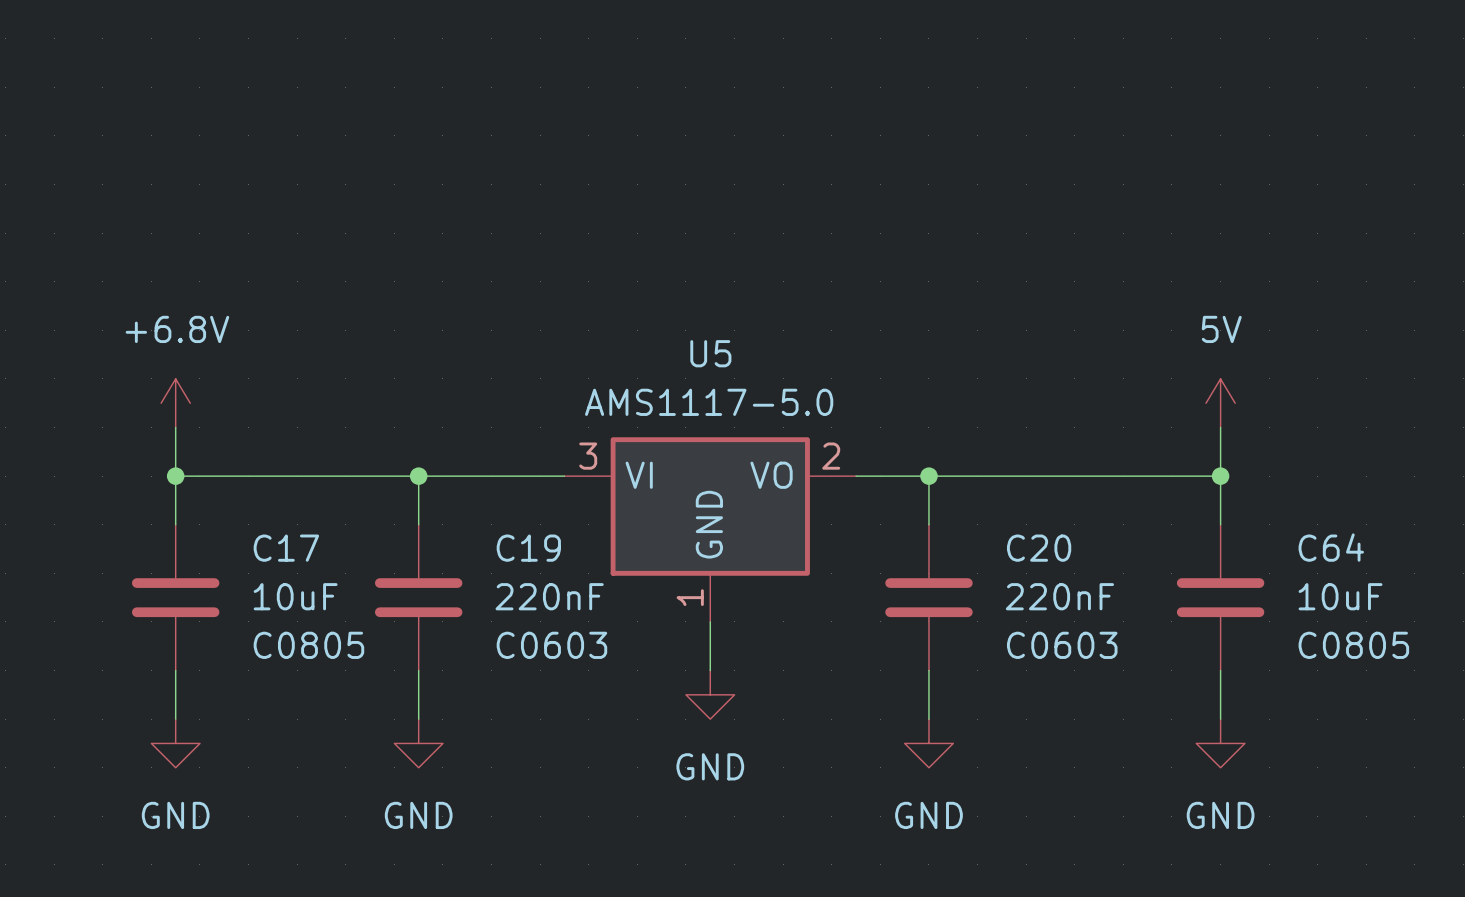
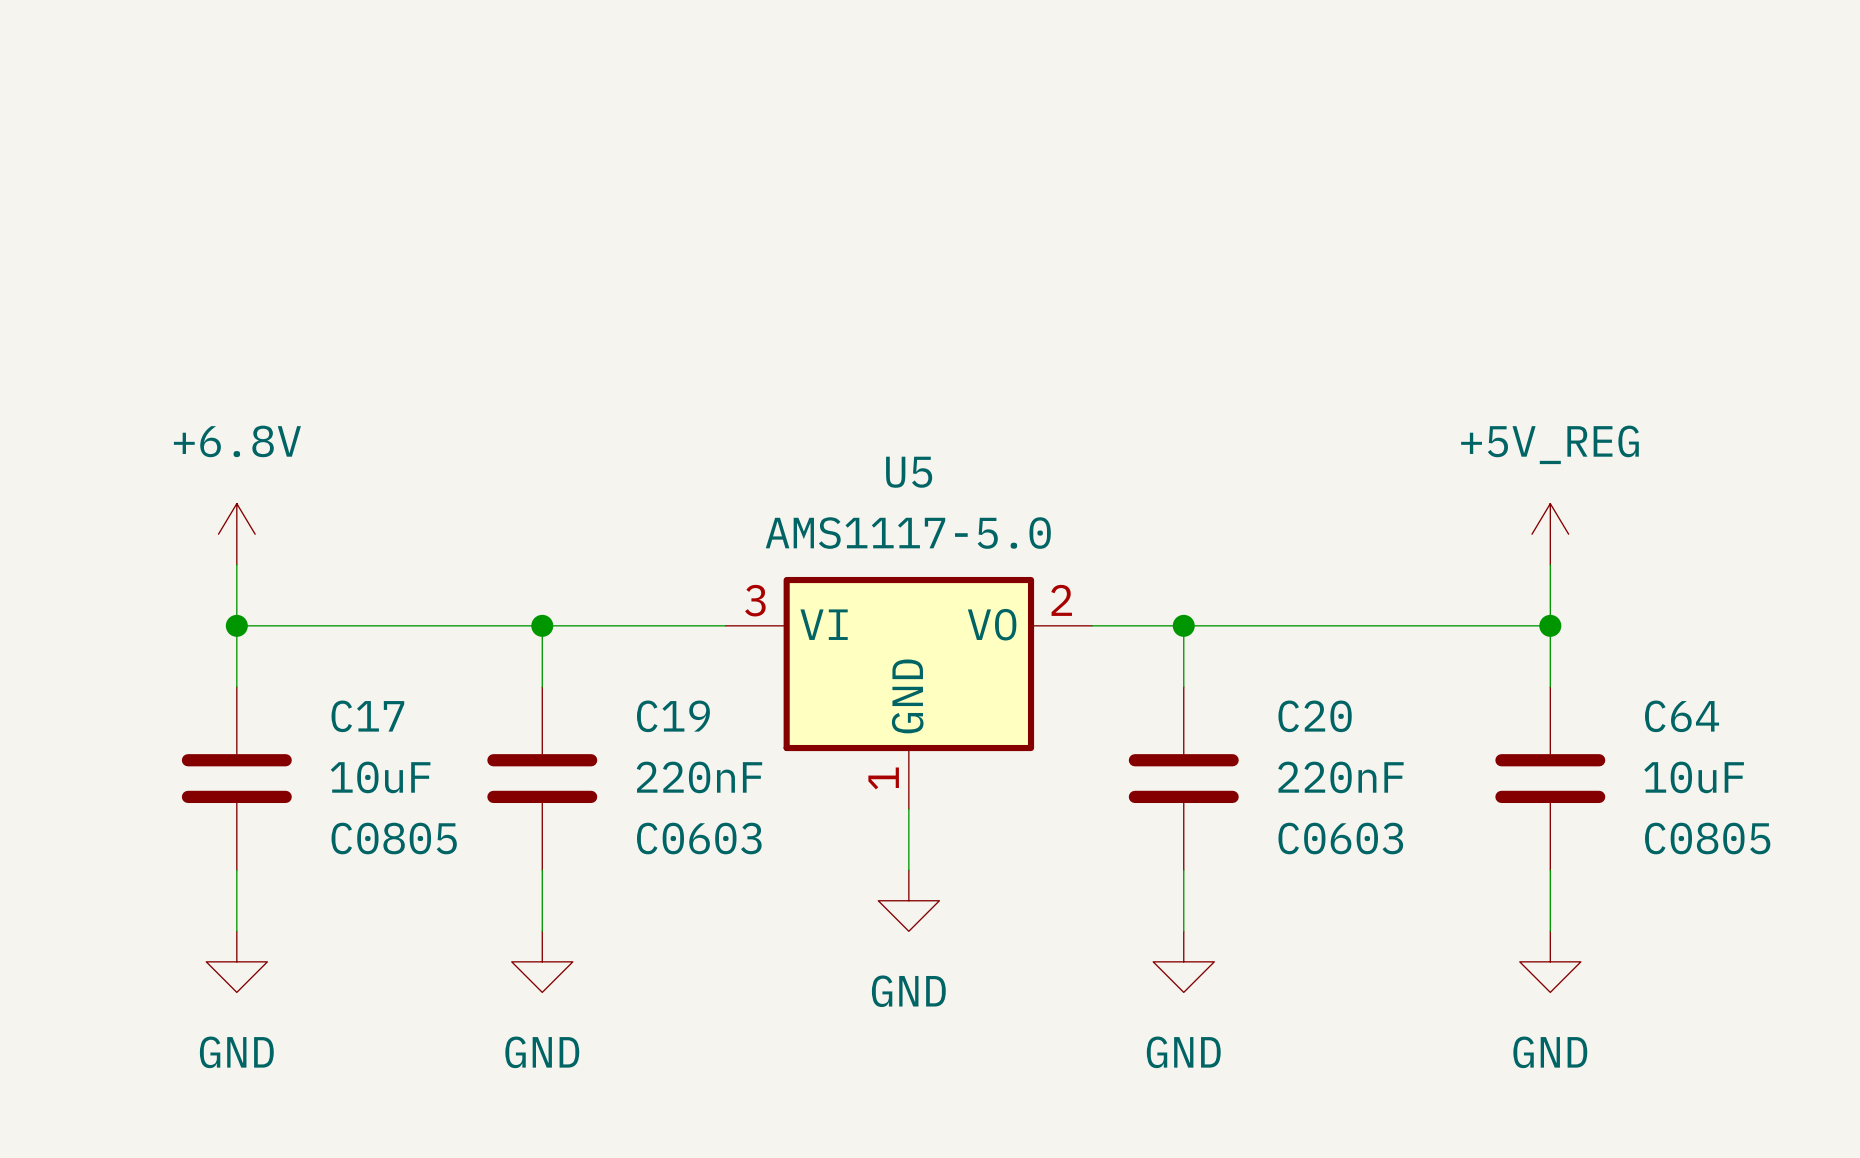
power symbol: 5V (1220, 403) -> +5V_REG (1550, 534)

